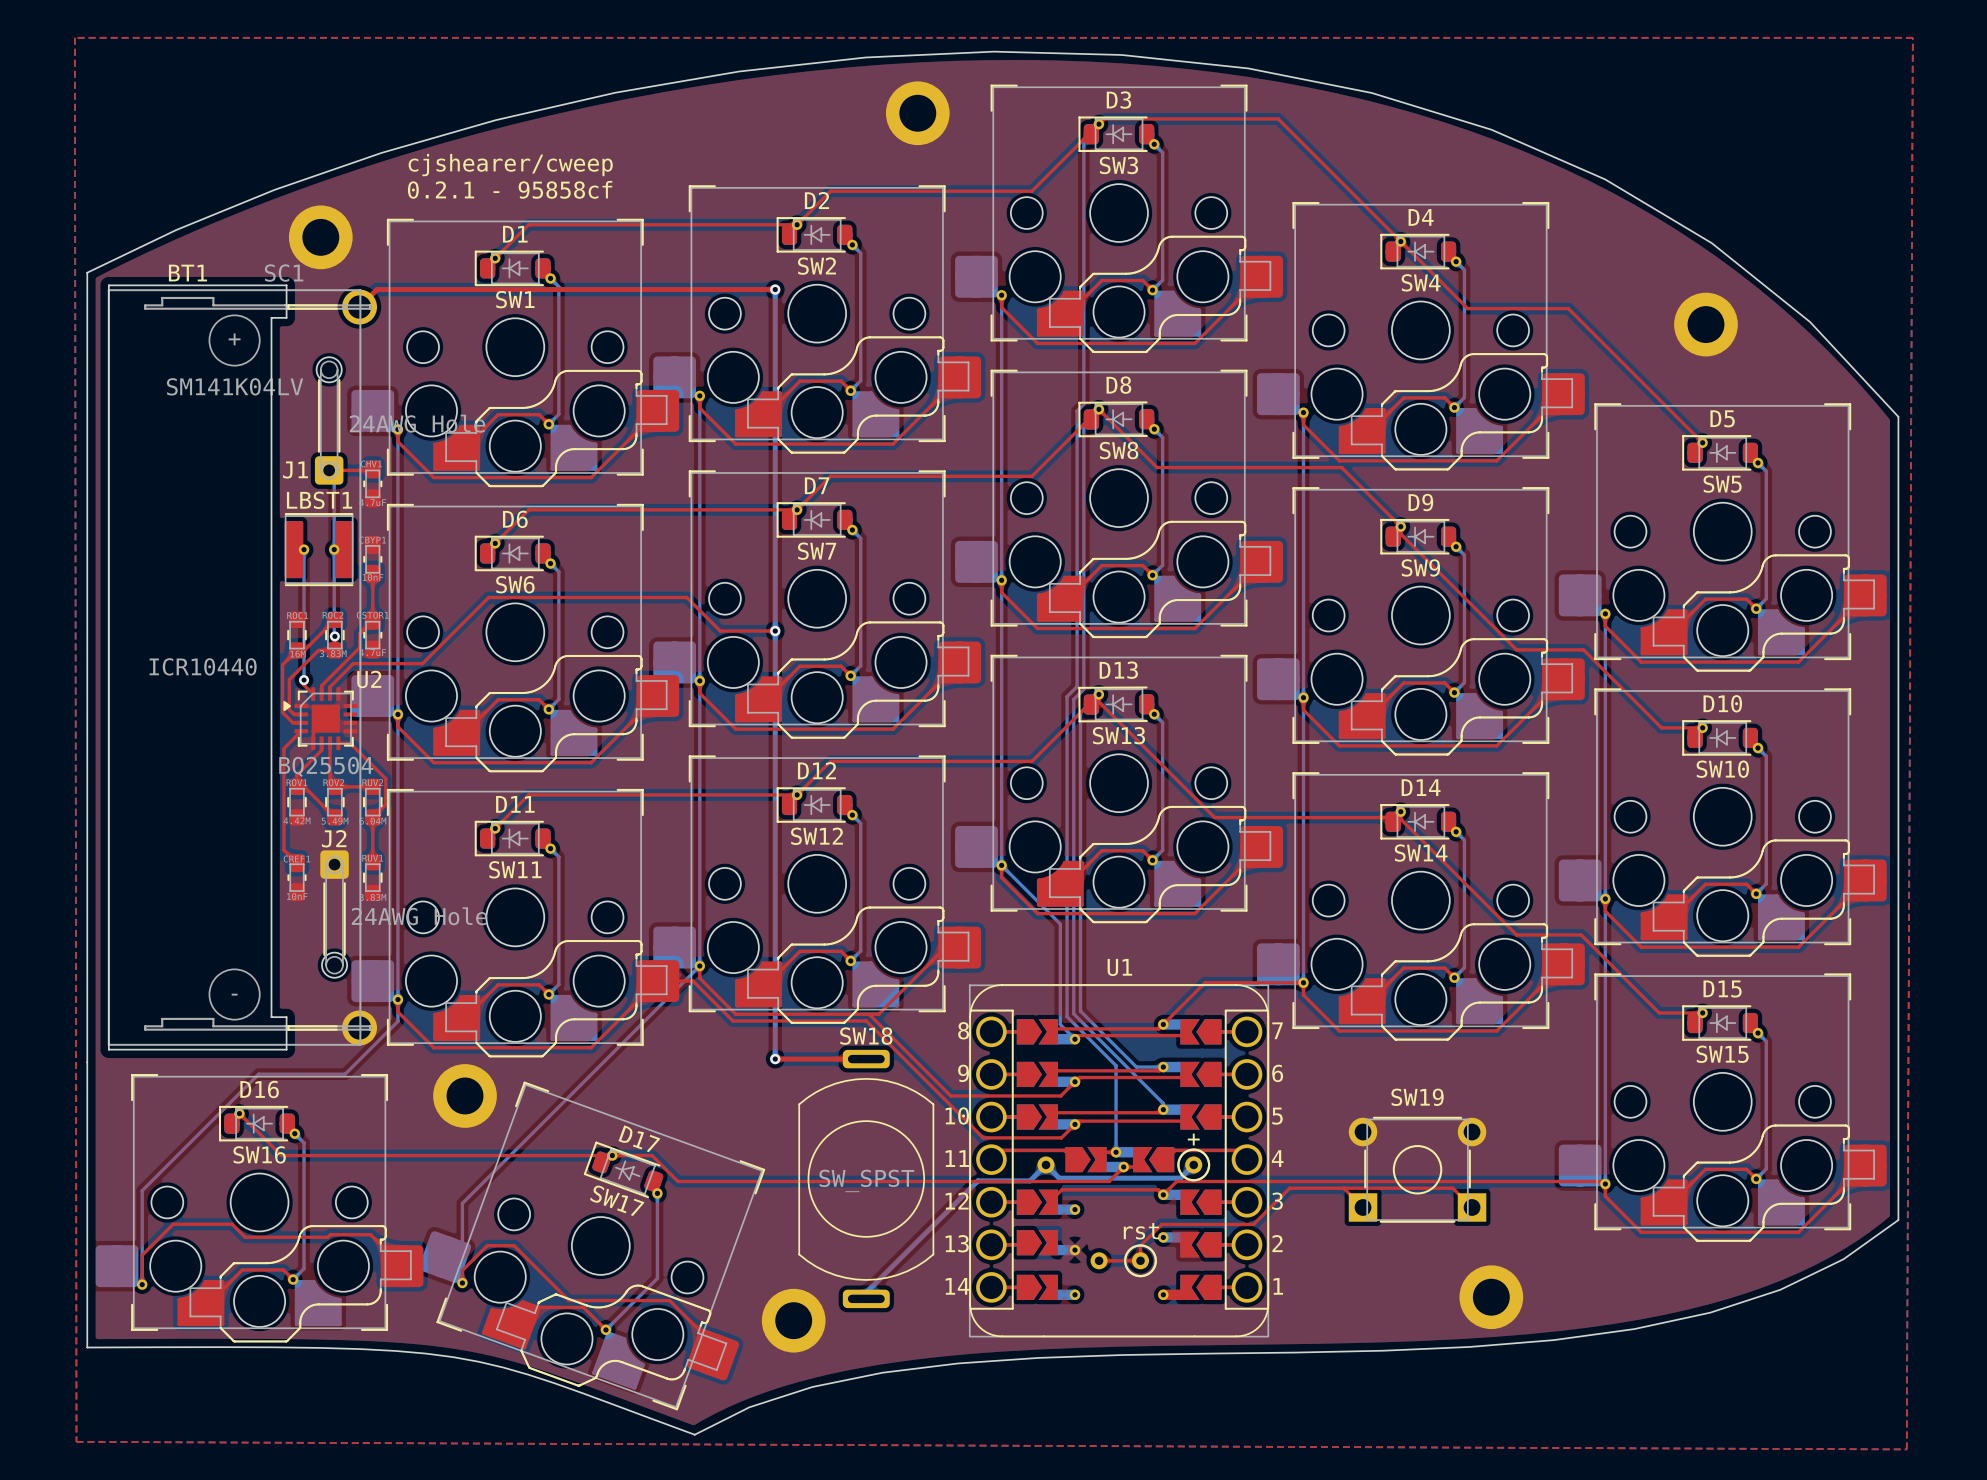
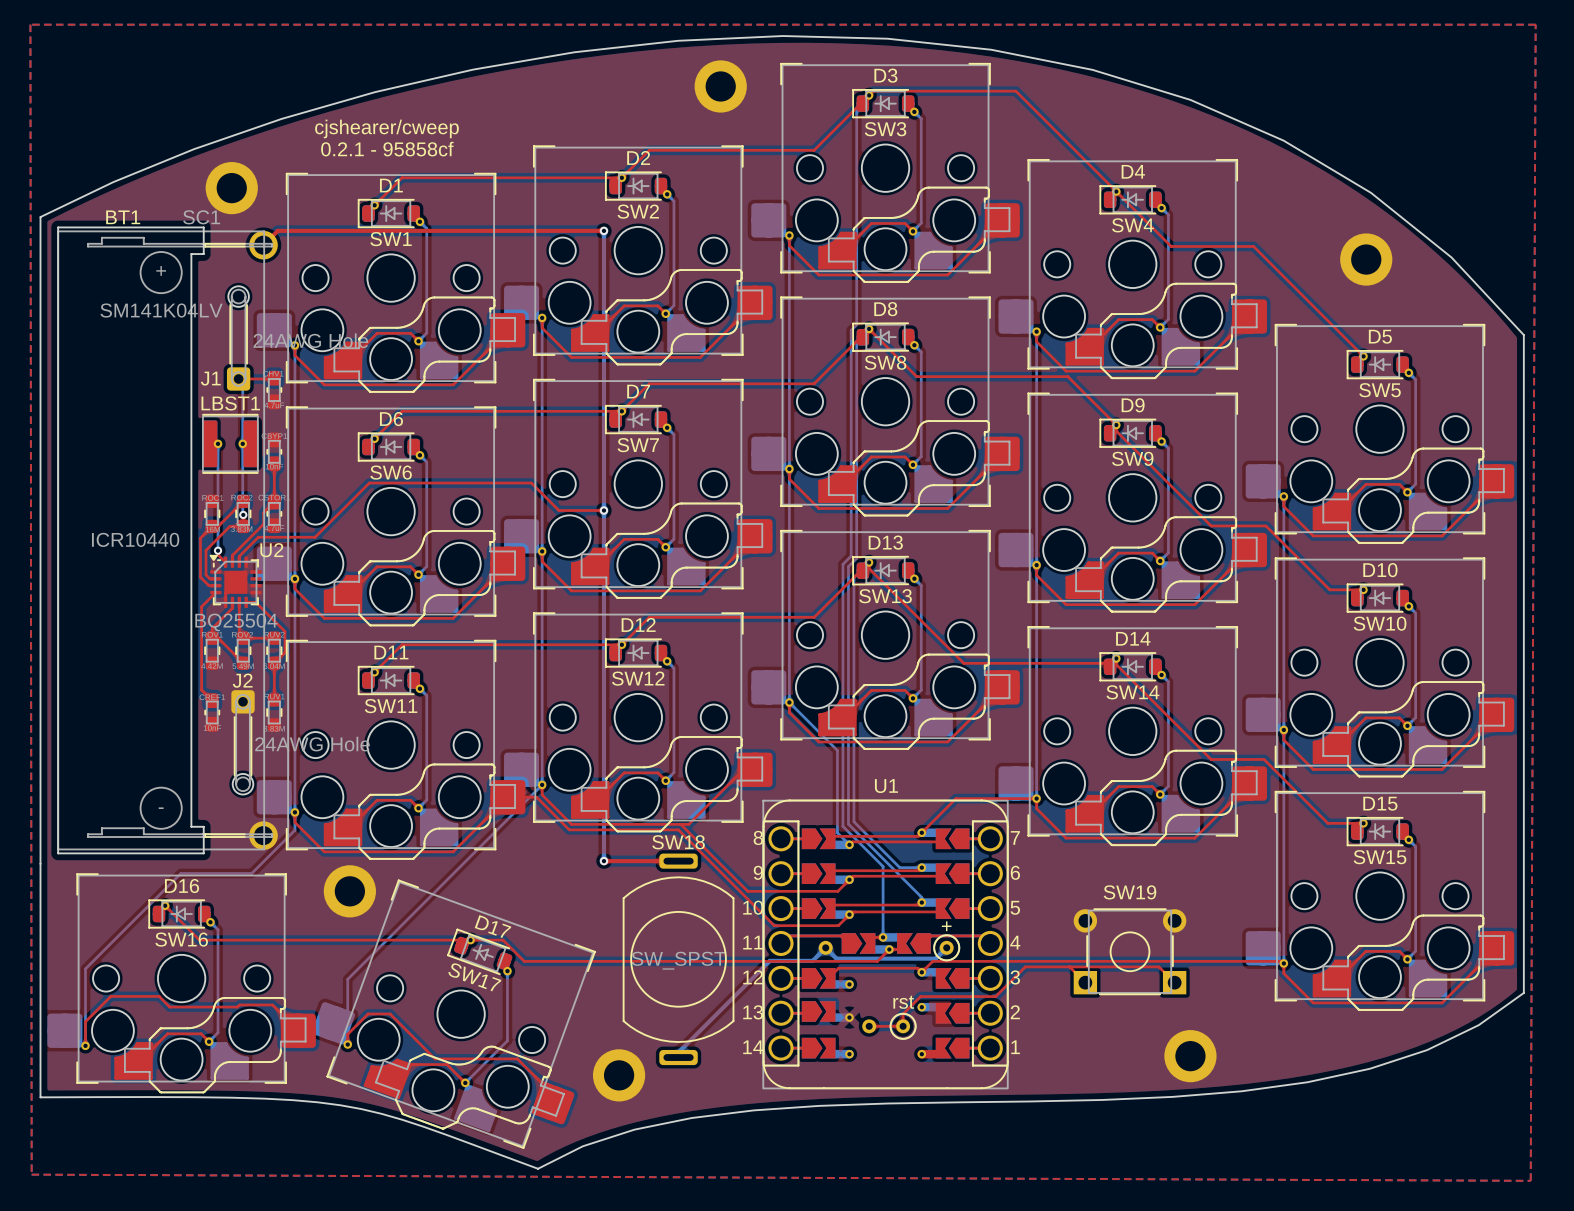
U2 footprint: [283, 687, 358, 751] -> [209, 554, 262, 609]

